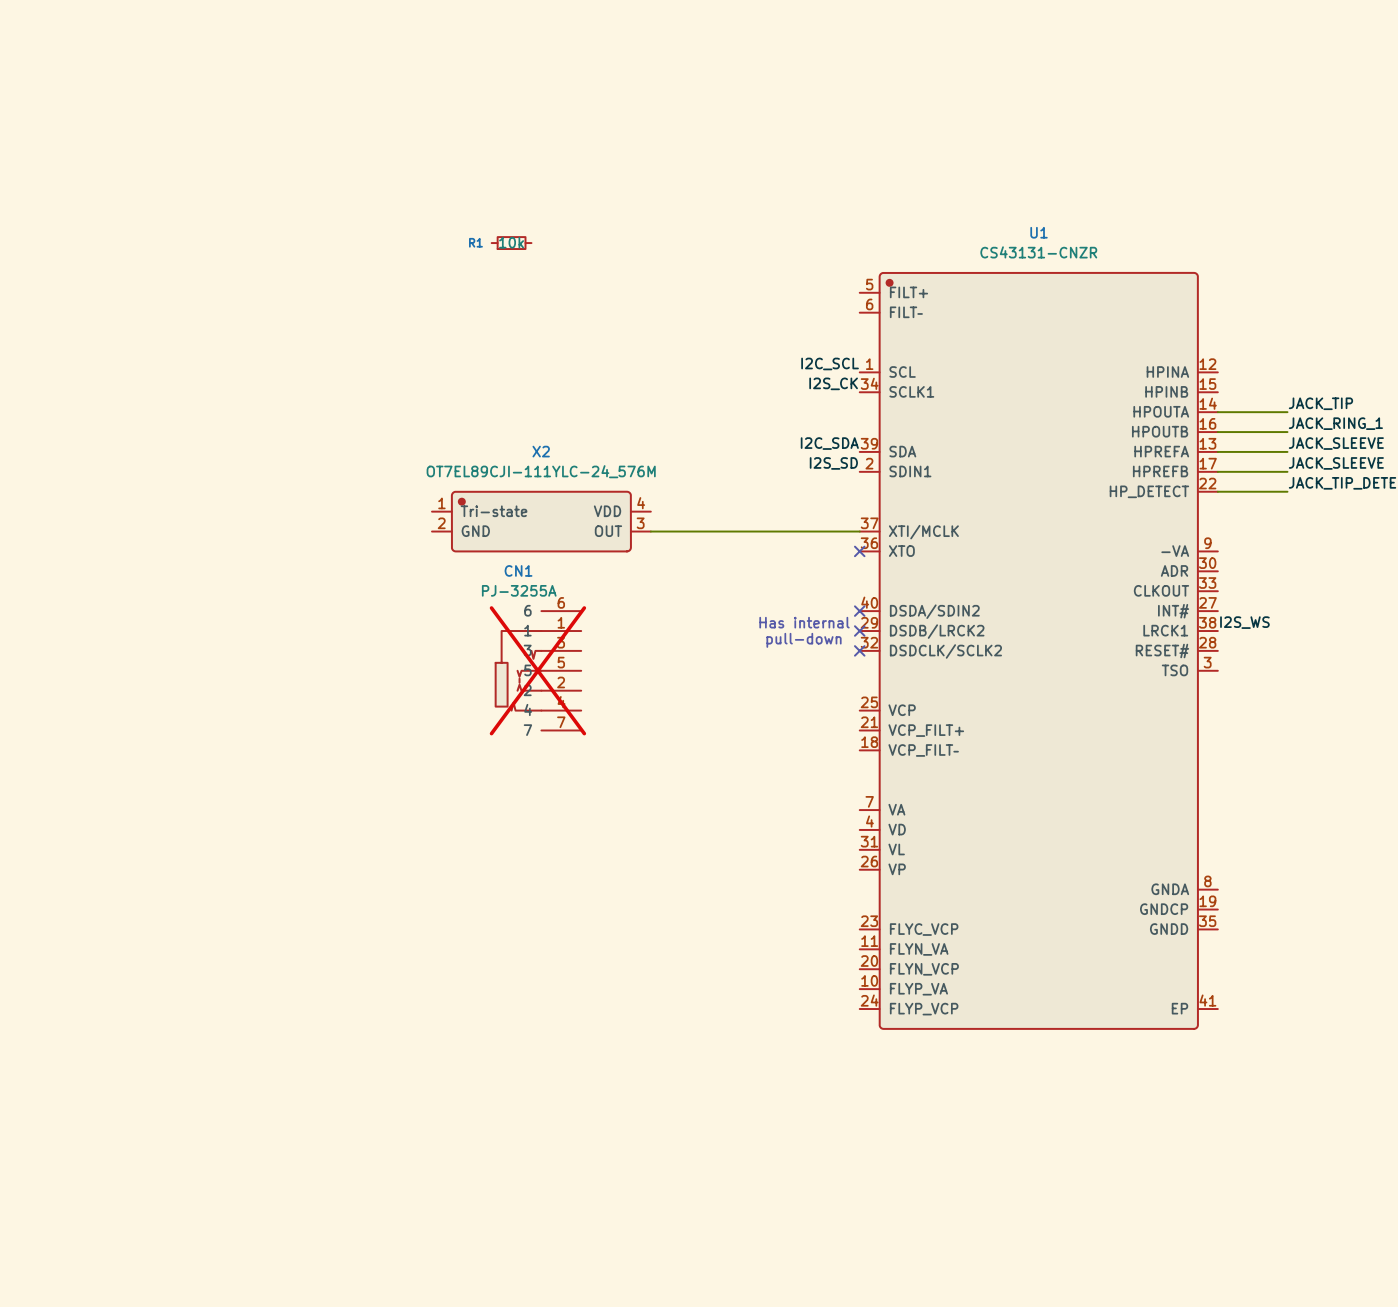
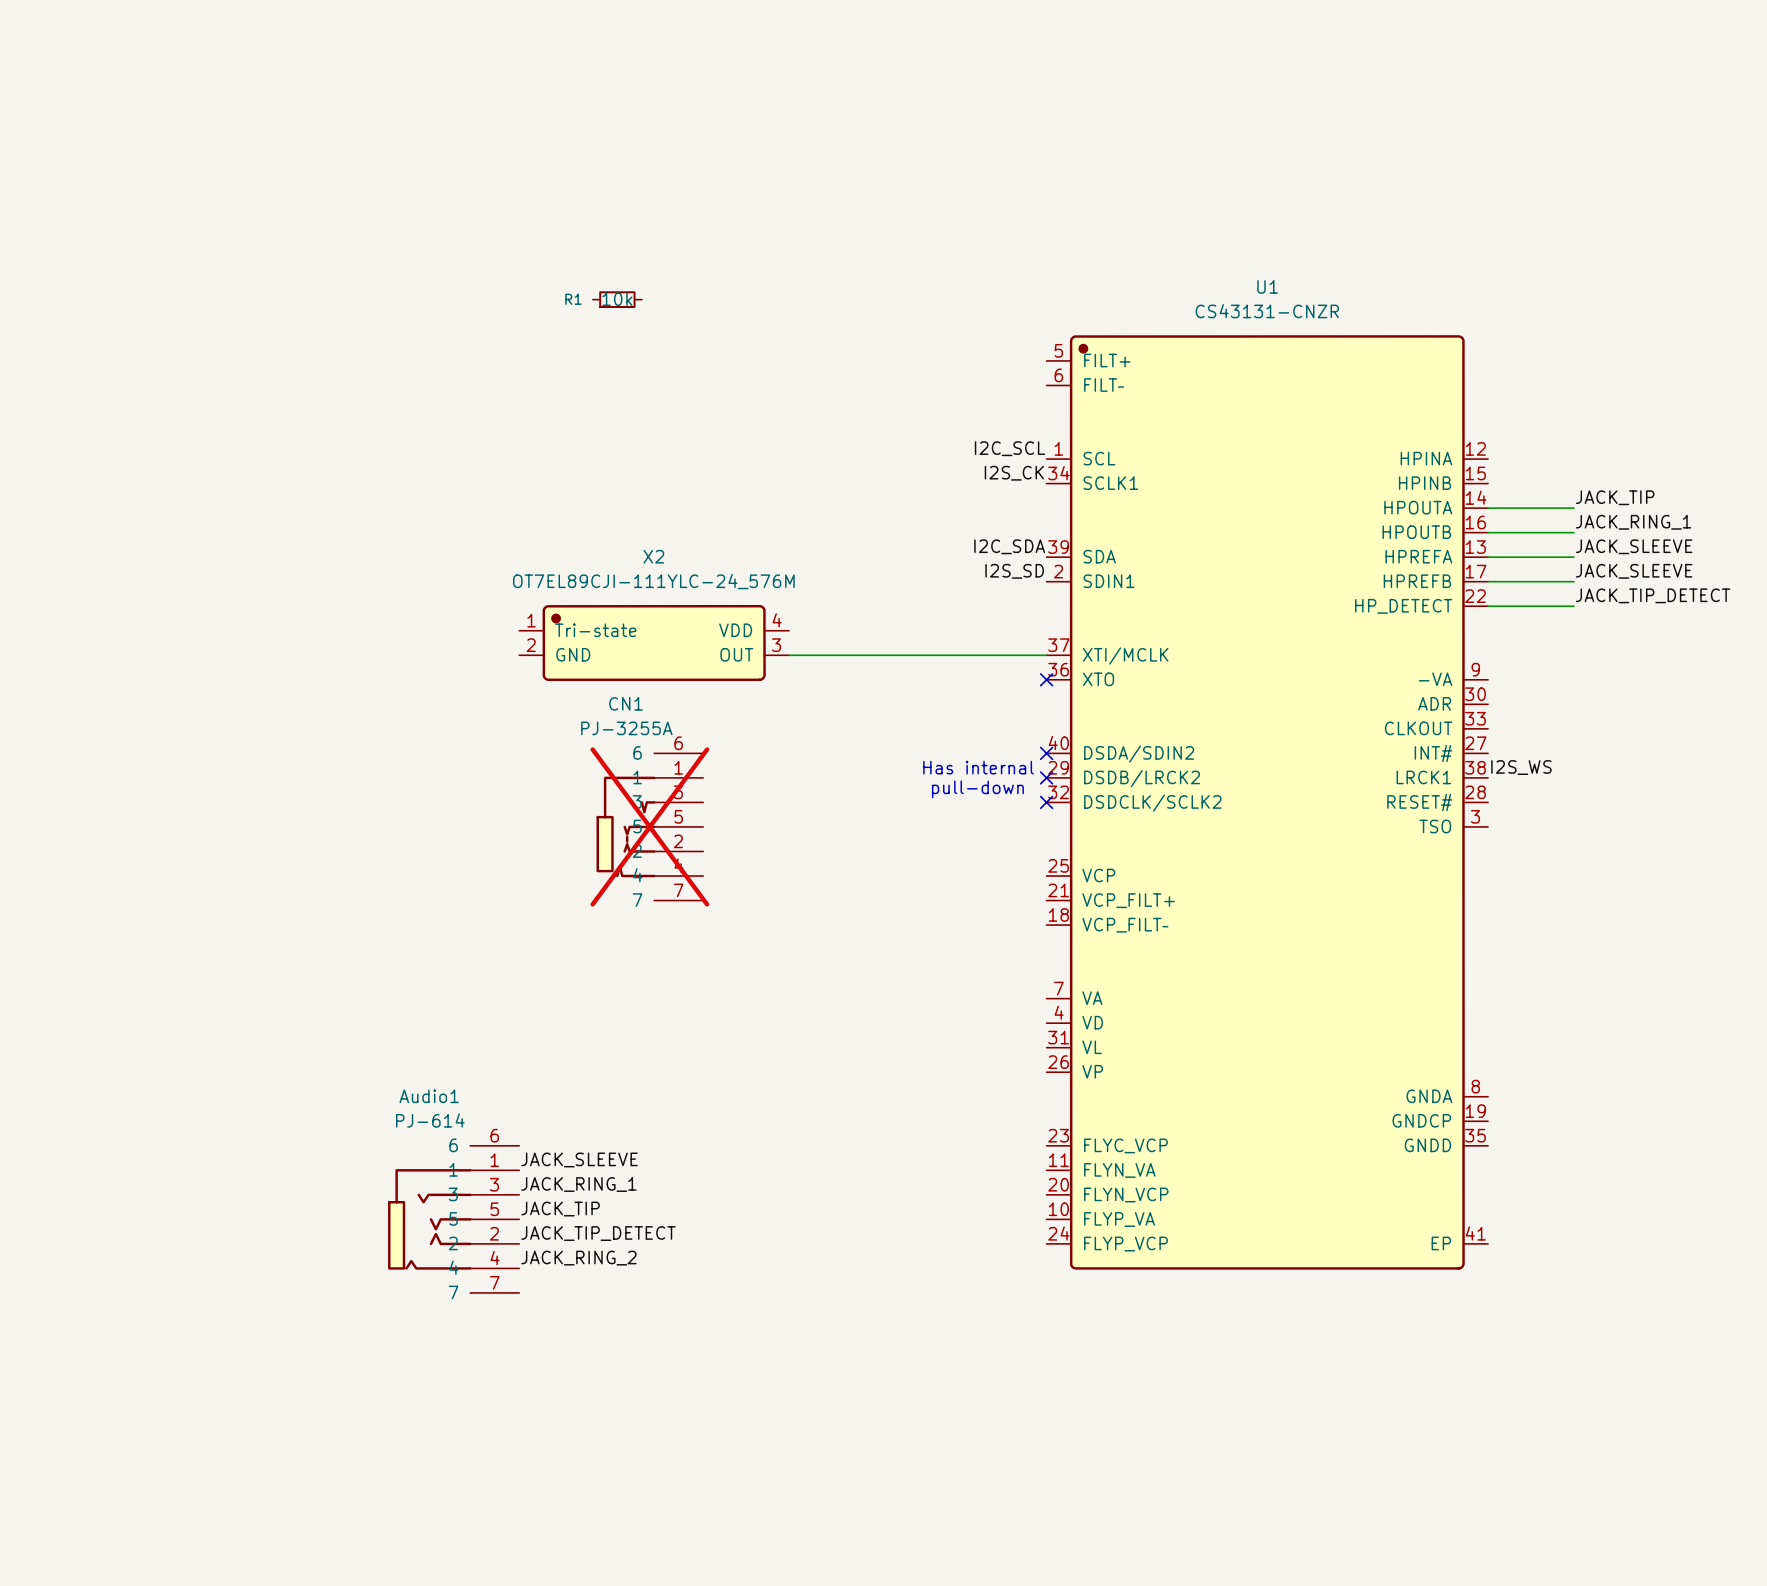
label: none -> JACK_SLEEVE (579, 1159)
label: none -> JACK_RING_1 (578, 1184)
label: none -> JACK_TIP (560, 1209)
Audio1: none -> PJ-614 (453, 1219)
label: none -> JACK_TIP_DETECT (598, 1233)
label: none -> JACK_RING_2 (578, 1258)

